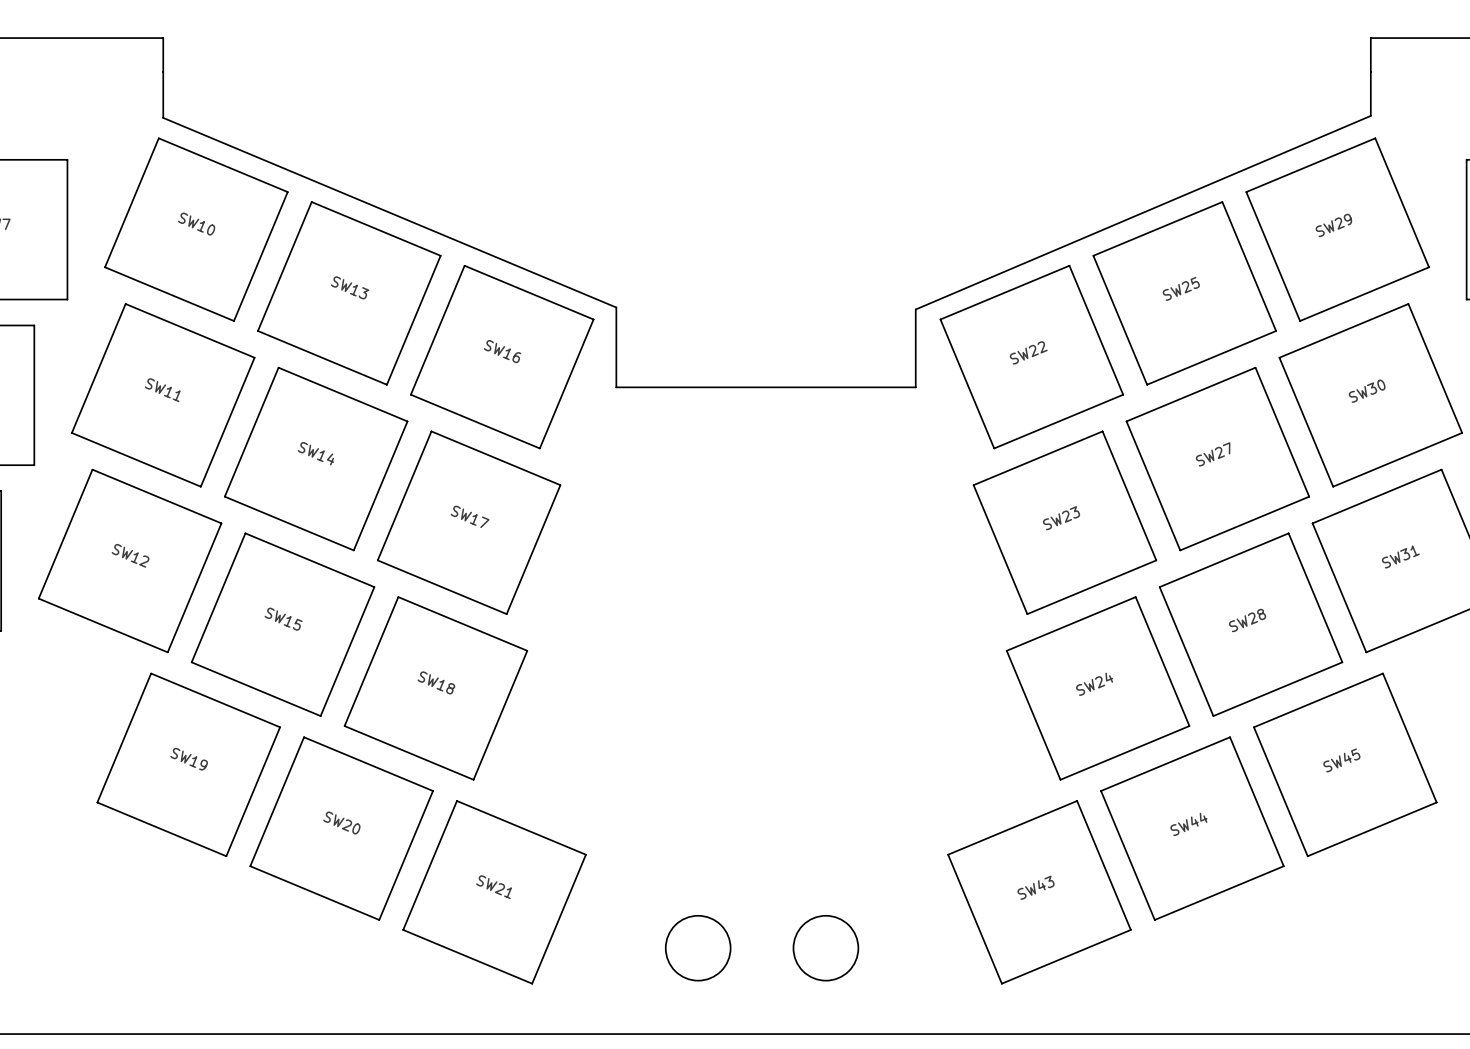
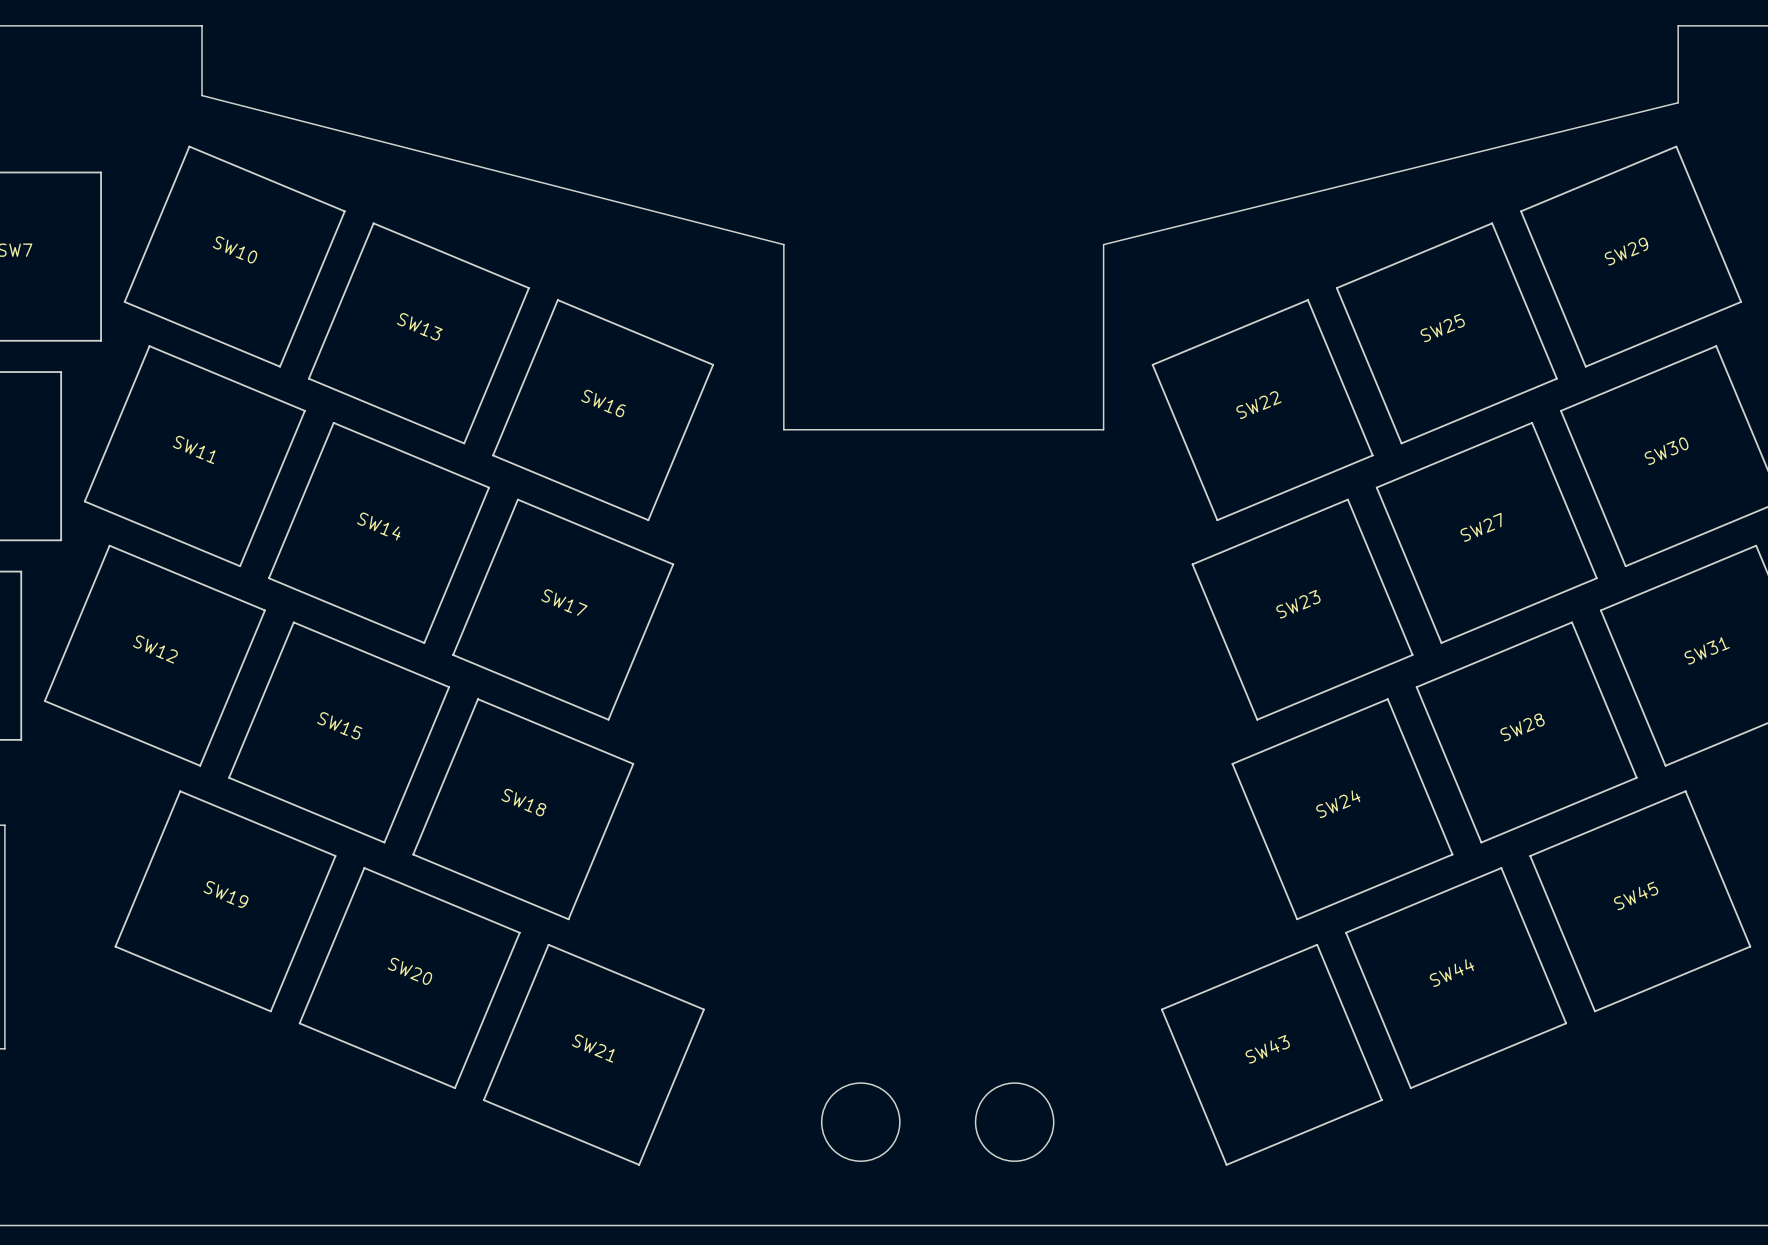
board edge: (151, 38) (163, 38) (163, 117) (616, 307) (616, 387) (915, 387) (915, 309) (1370, 115) (1370, 38) (1376, 38) -> (202, 25) (202, 95) (783, 244) (783, 429) (1103, 429) (1103, 244) (1678, 102) (1678, 25)
SW10 position: (196, 229) -> (234, 256)
SW13 position: (349, 293) -> (418, 333)
SW16 position: (502, 357) -> (603, 410)
SW11 position: (163, 395) -> (194, 456)
SW14 position: (316, 459) -> (379, 532)
SW17 position: (469, 522) -> (563, 609)
SW12 position: (130, 561) -> (154, 655)
SW15 position: (283, 624) -> (339, 732)
SW18 position: (435, 688) -> (523, 809)
SW19 position: (188, 764) -> (225, 901)
SW20 position: (341, 828) -> (409, 978)
SW21 position: (494, 892) -> (593, 1054)

